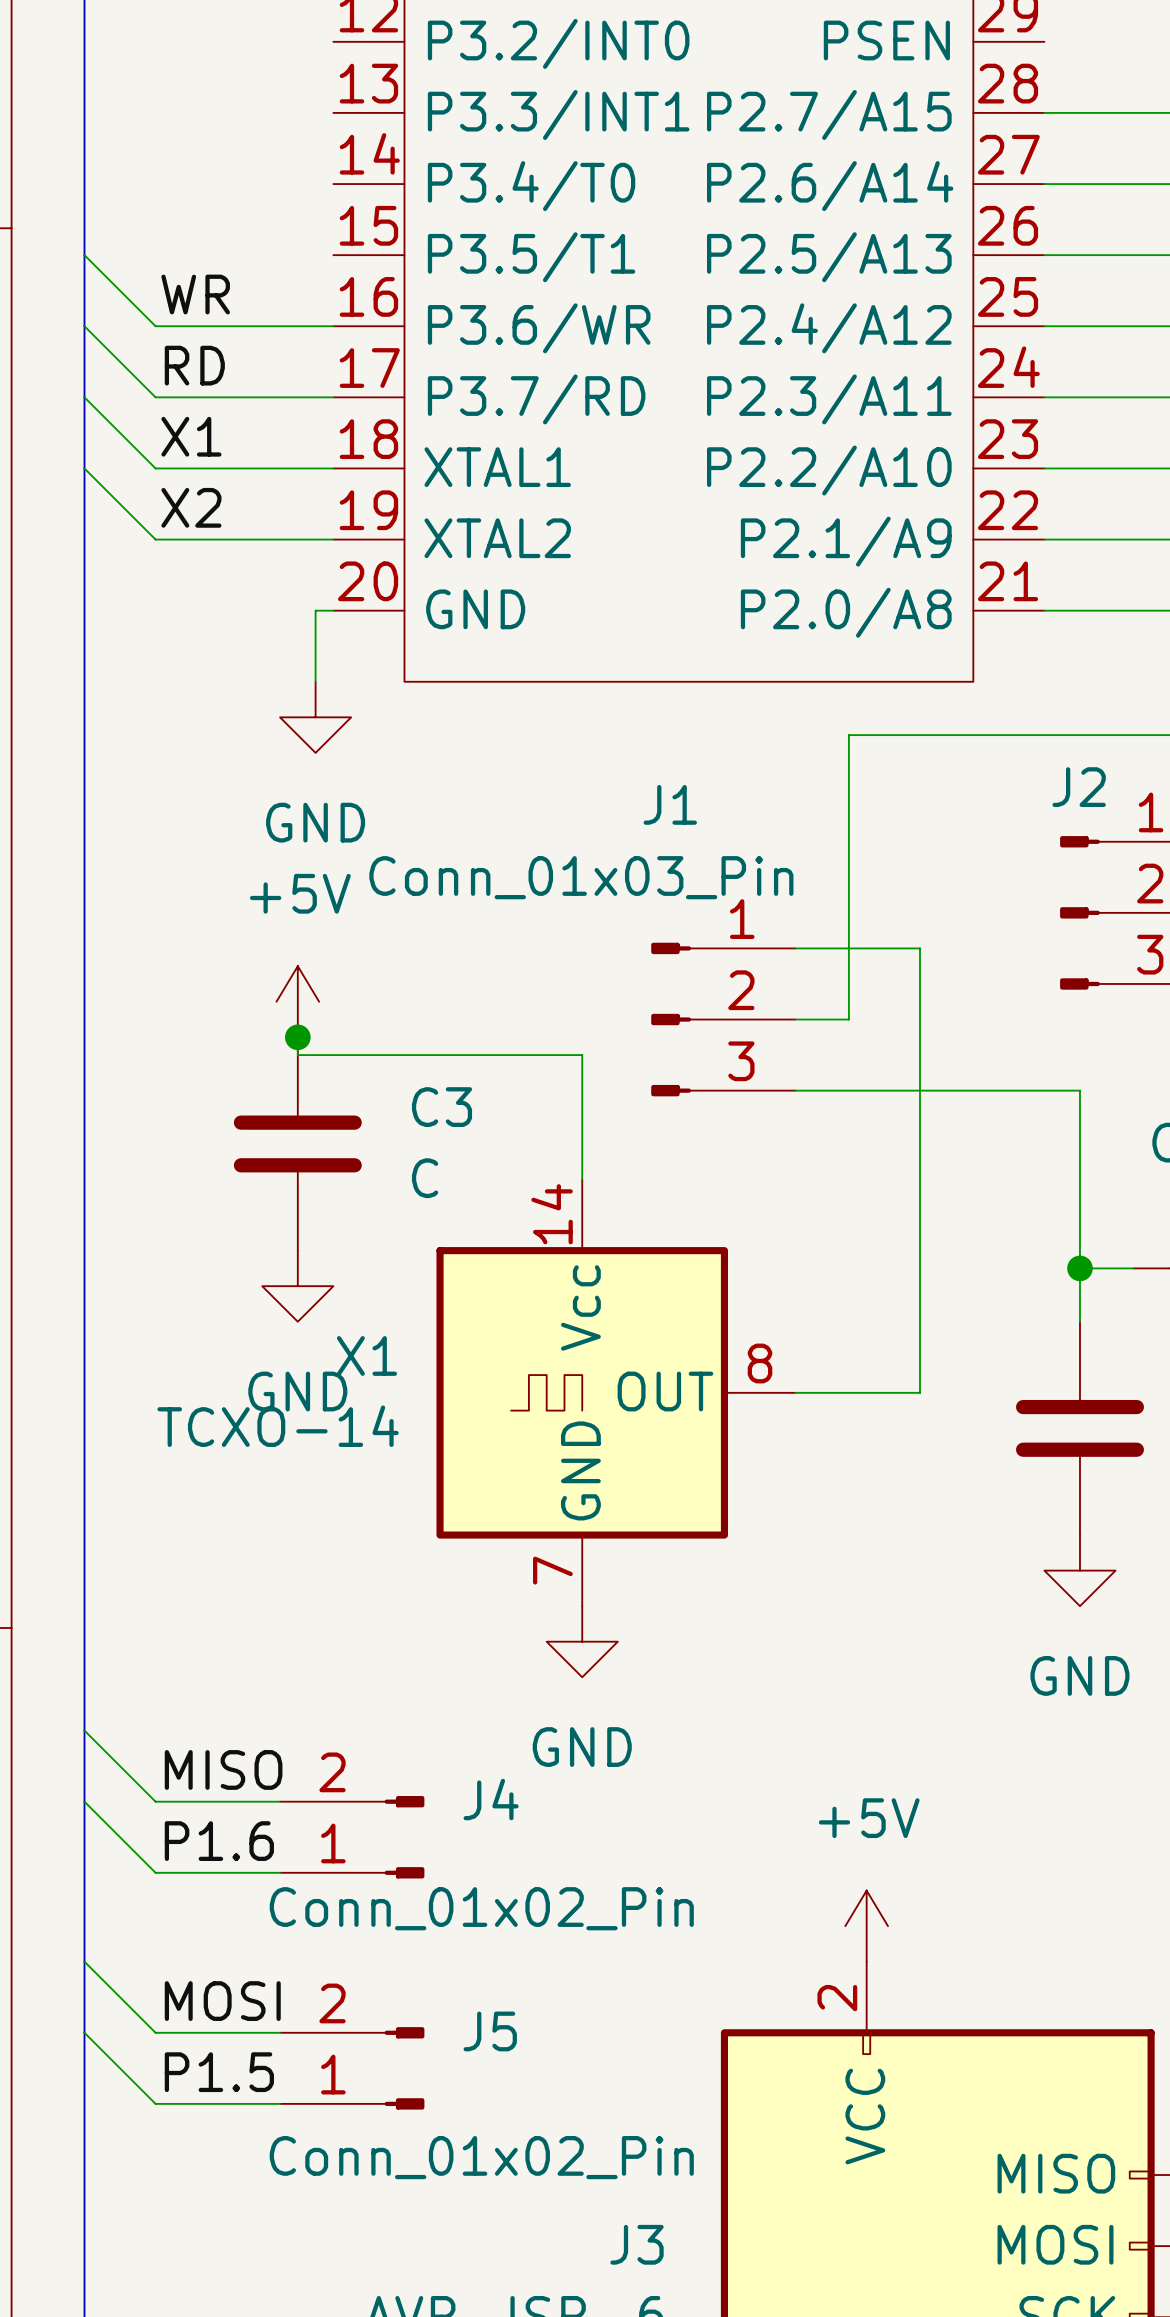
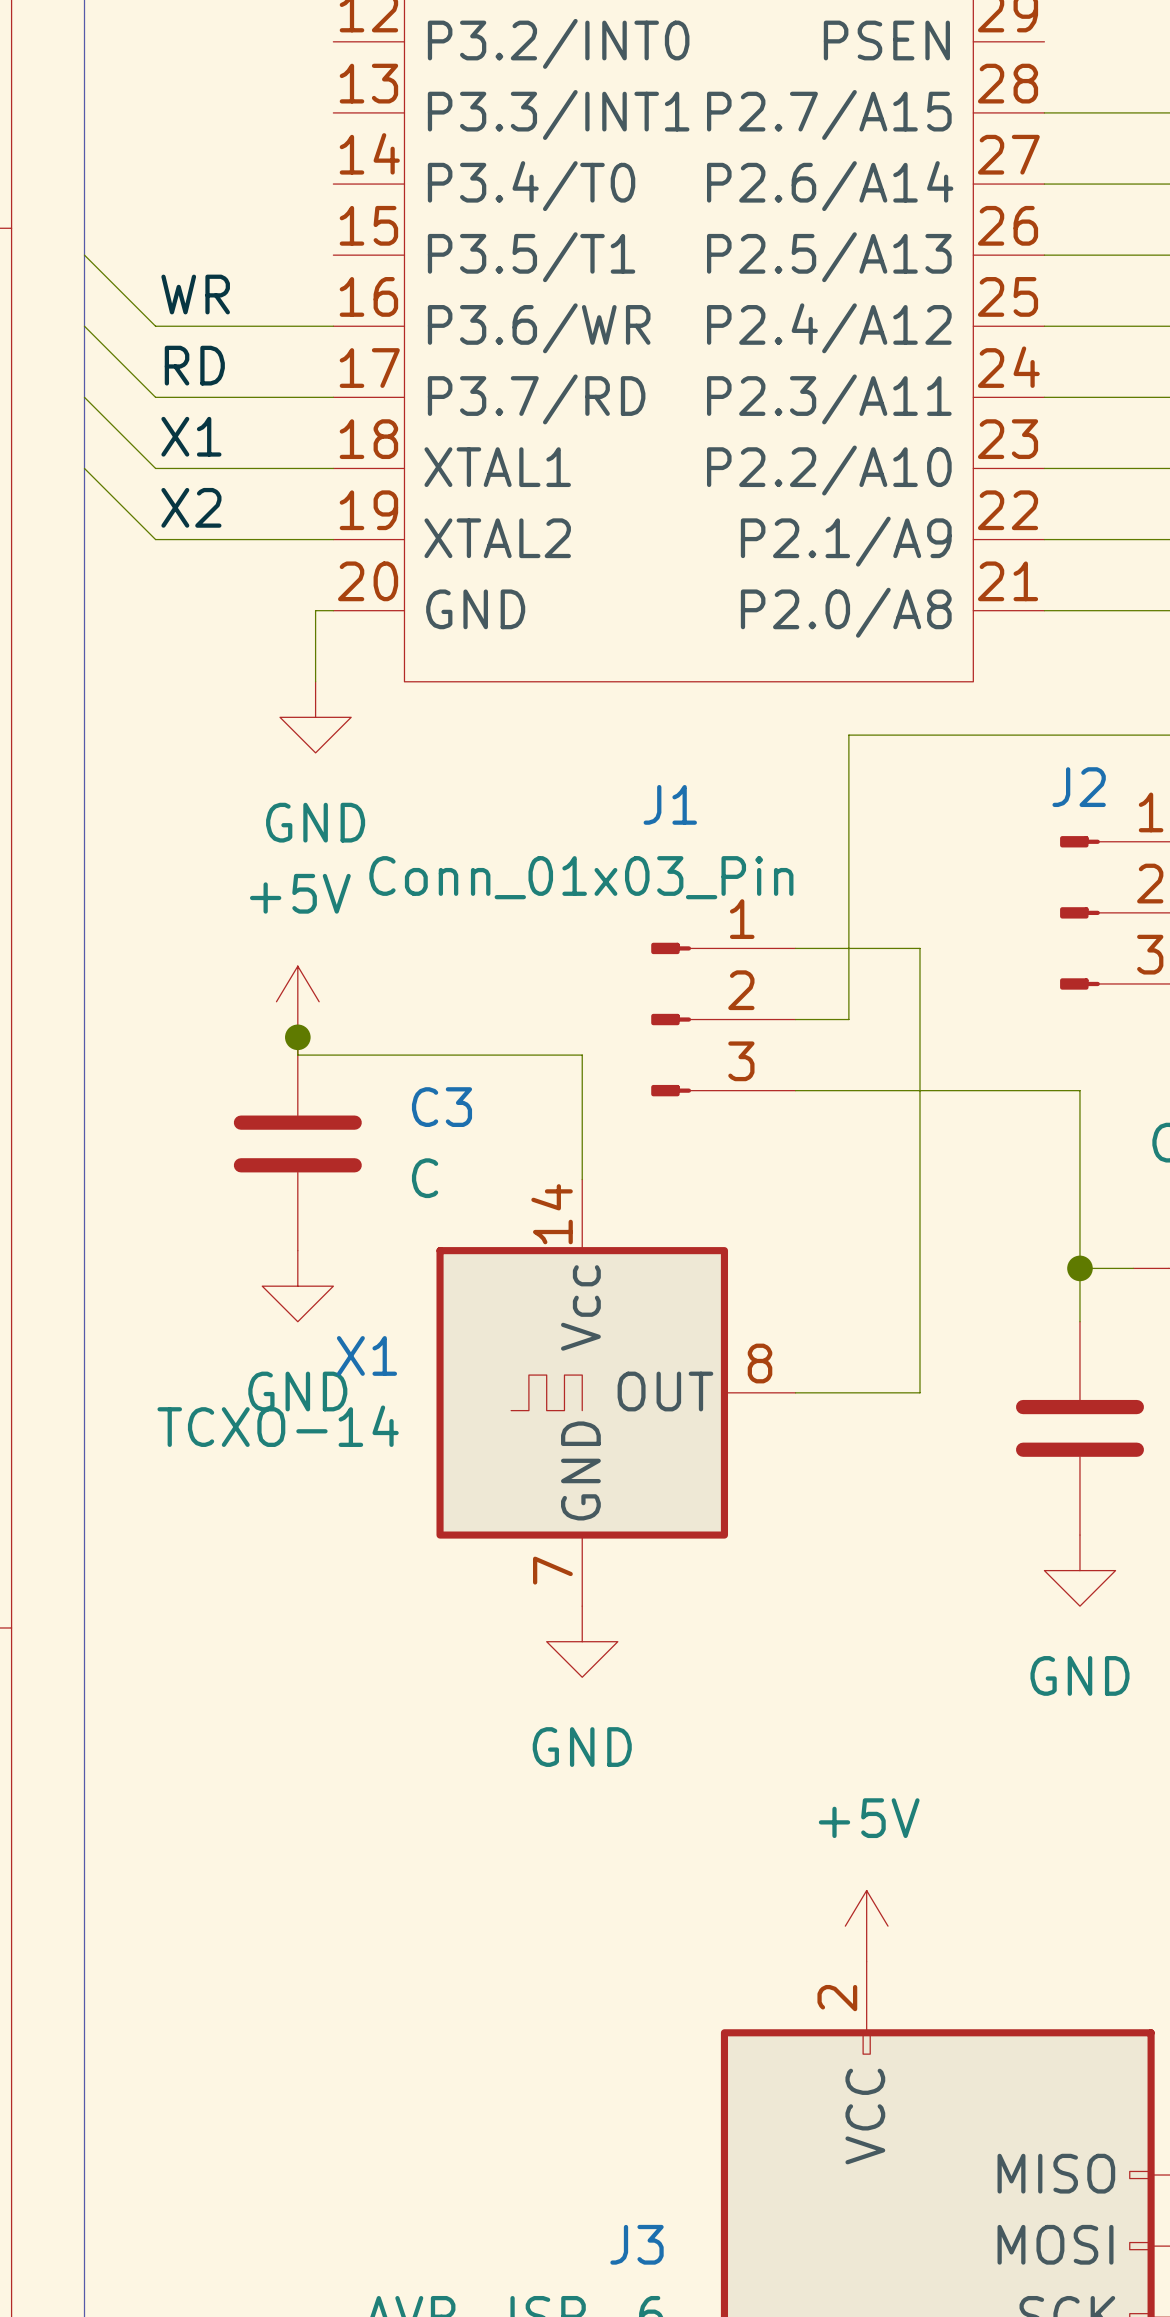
wire: (84, 1730) (155, 1801) -> none
label: MISO (223, 1769) -> none
wire: (84, 1801) (155, 1872) (280, 1872) -> none
wire: (155, 1801) (280, 1801) -> none
J4: Conn_01x02_Pin (352, 1837) -> none
label: P1.6 (219, 1841) -> none
wire: (84, 1961) (155, 2032) (280, 2032) -> none
label: MOSI (222, 2001) -> none
wire: (84, 2032) (155, 2103) (280, 2103) -> none
J5: Conn_01x02_Pin (352, 2068) -> none
label: P1.5 (219, 2072) -> none

